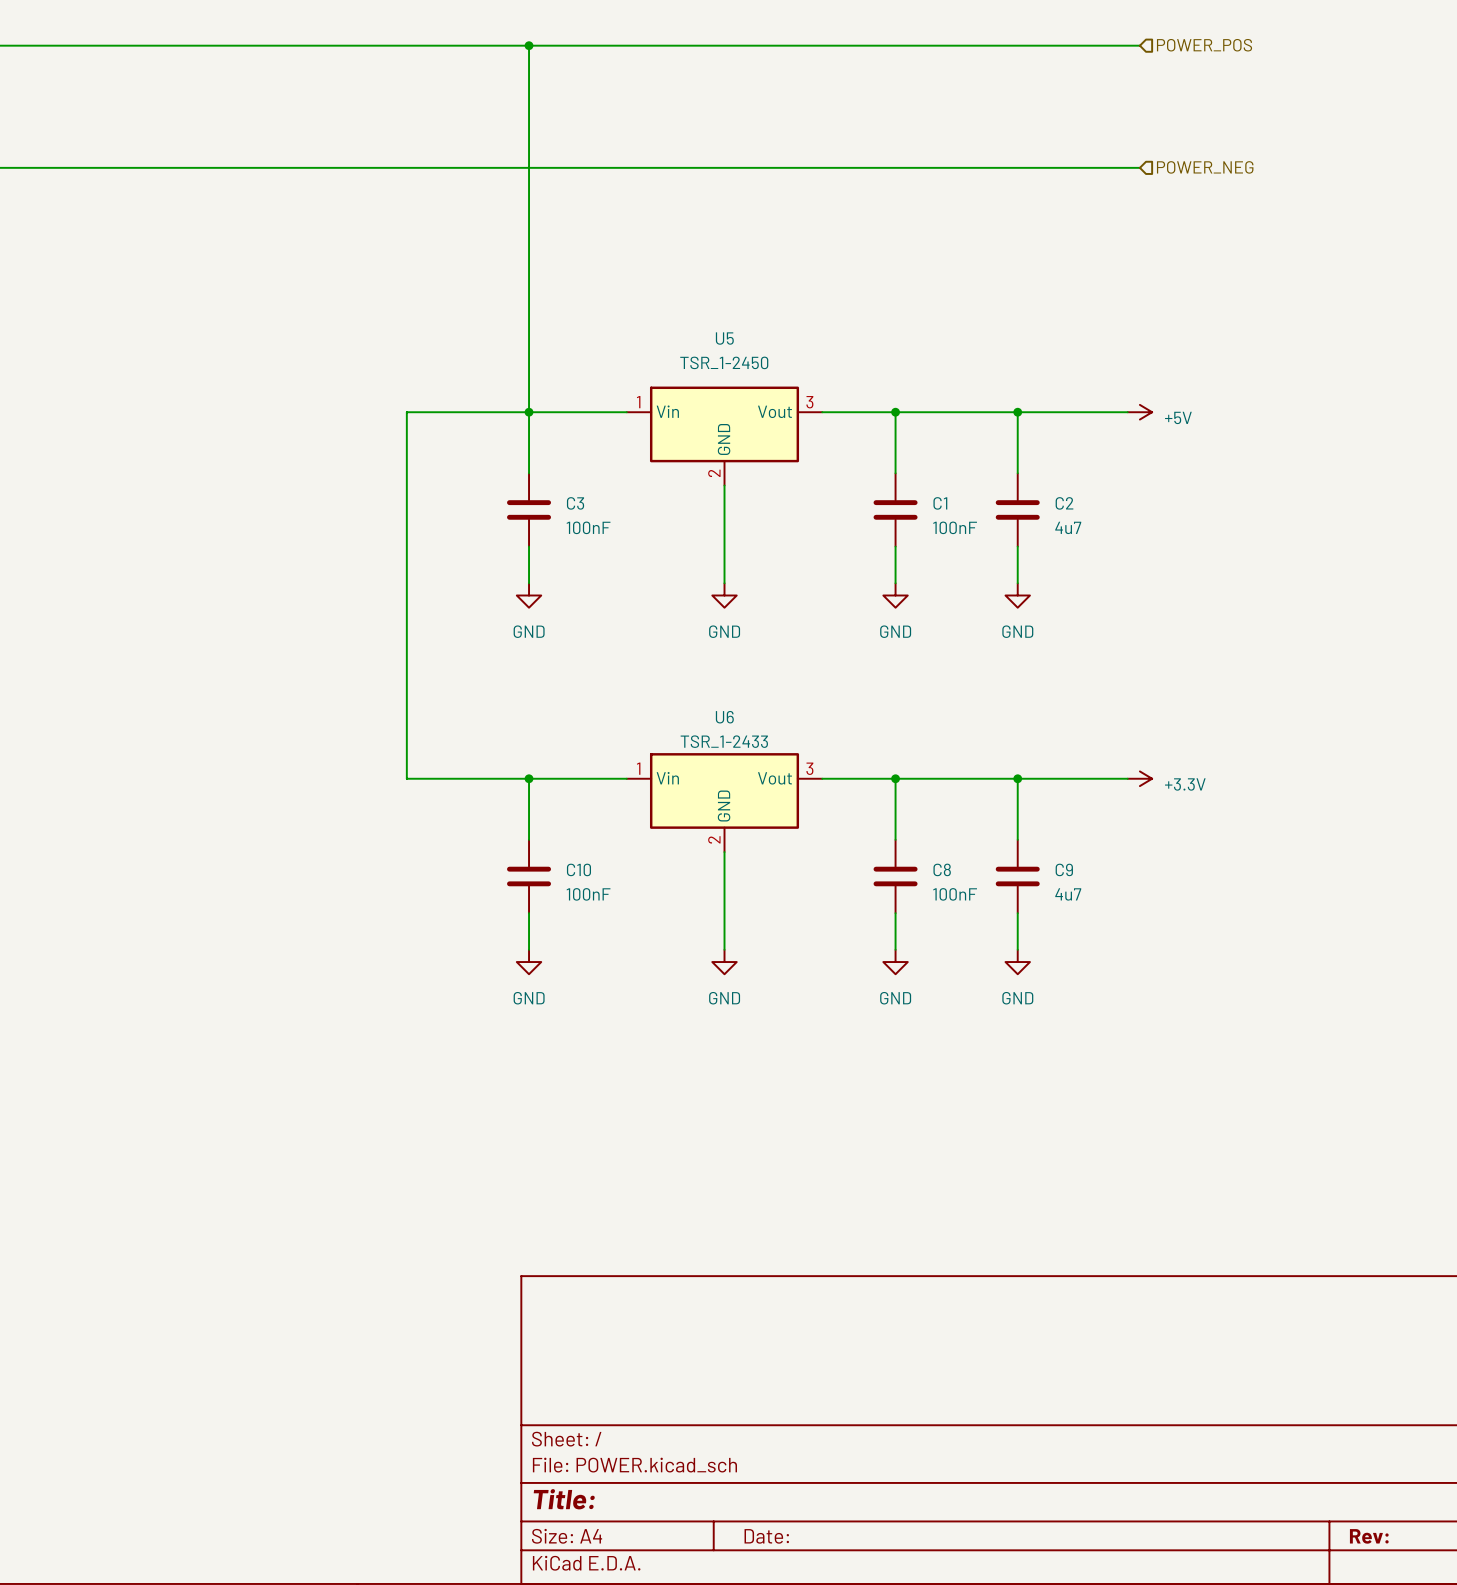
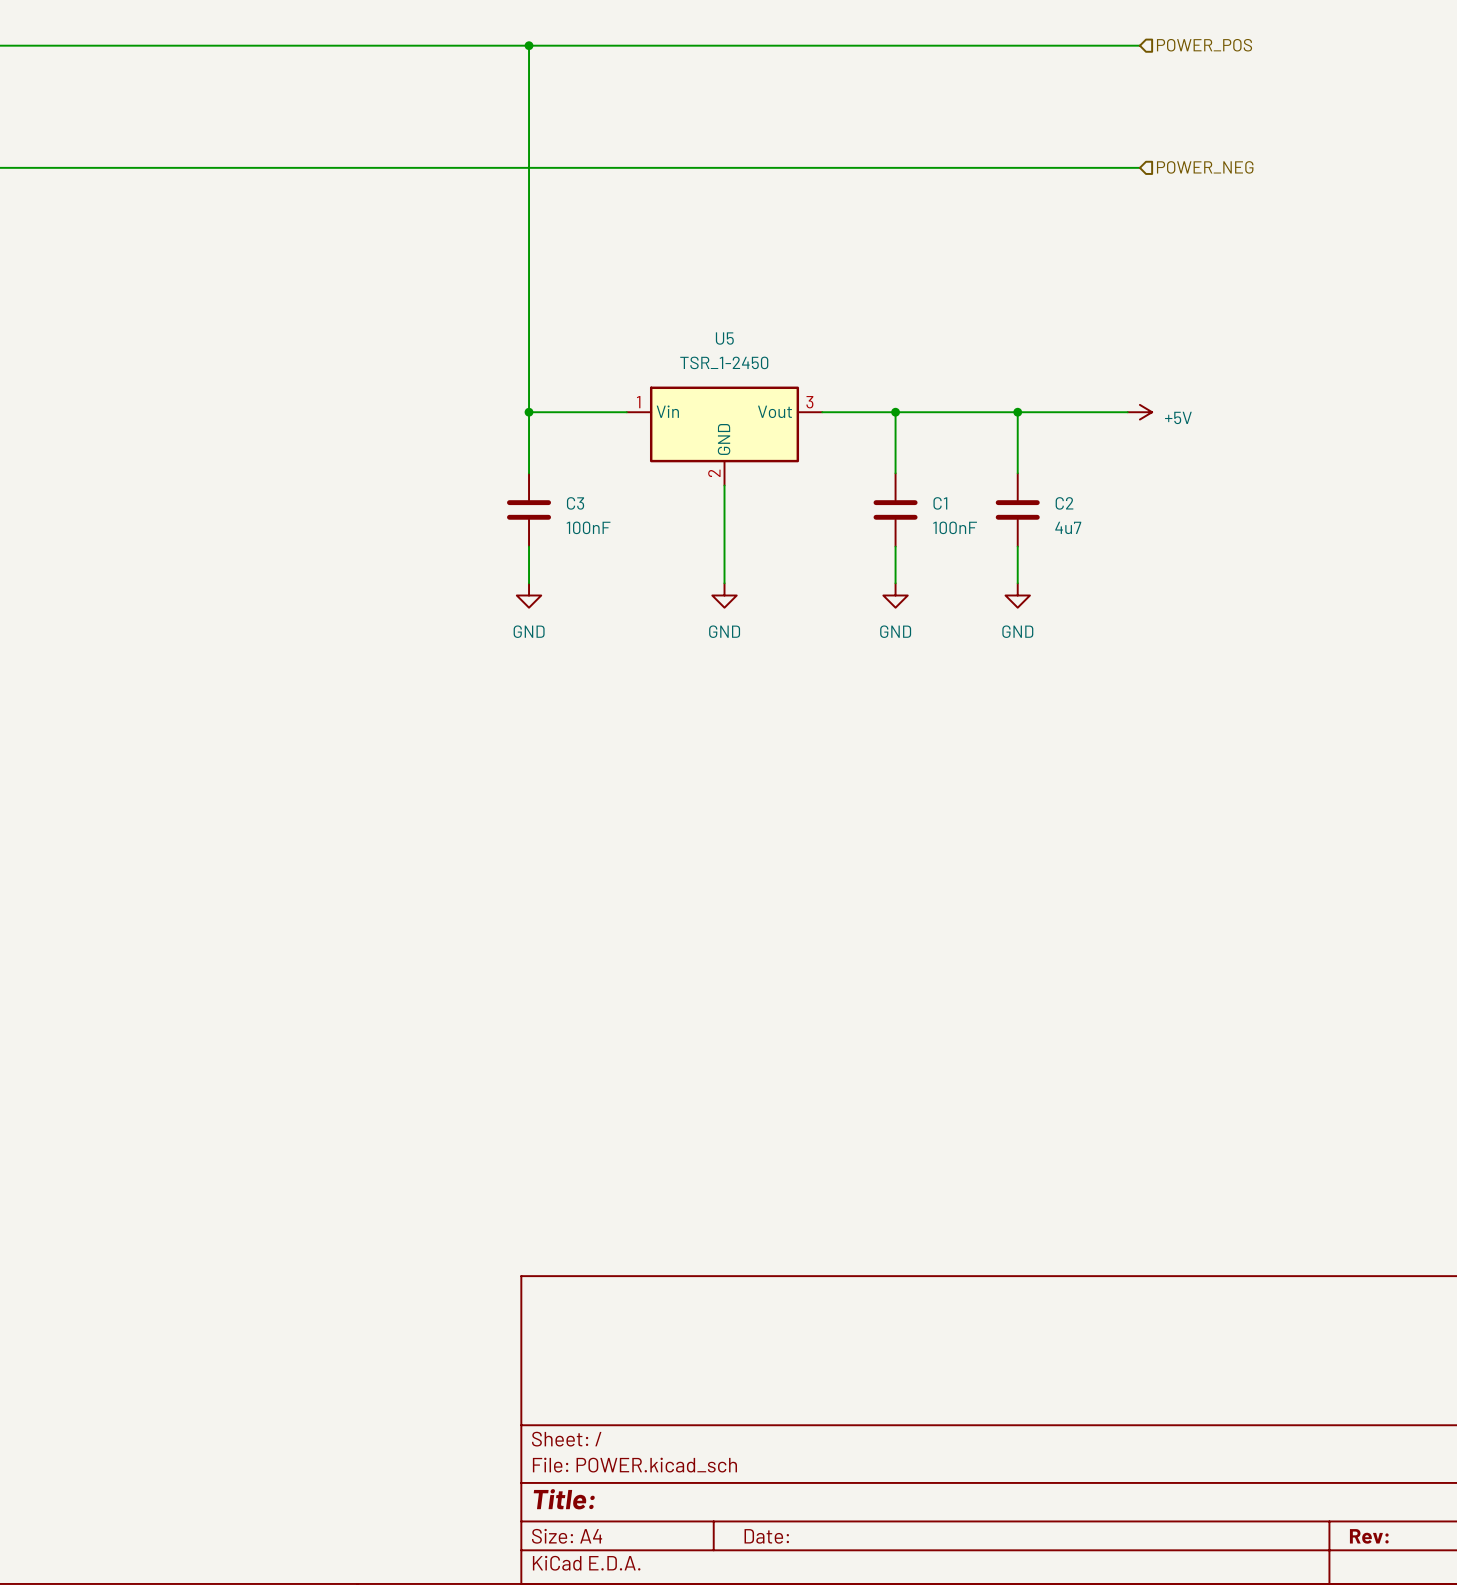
wire: (529, 412) (406, 412) (406, 778) (626, 778) -> none
wire: (529, 778) (529, 839) -> none
junction: (529, 778) -> none
wire: (822, 778) (1127, 778) -> none
wire: (895, 778) (895, 839) -> none
junction: (895, 778) -> none
wire: (1017, 778) (1017, 839) -> none
junction: (1017, 778) -> none
power symbol: +3.3V (1139, 778) -> none
U6: TSR_1-2433 (724, 802) -> none
wire: (724, 852) (724, 949) -> none
C10: 100nF (529, 876) -> none
C8: 100nF (895, 876) -> none
C9: 4u7 (1017, 876) -> none
wire: (529, 913) (529, 949) -> none
wire: (895, 913) (895, 949) -> none
wire: (1017, 913) (1017, 949) -> none
power symbol: GND (529, 962) -> none
power symbol: GND (724, 962) -> none
power symbol: GND (895, 962) -> none
power symbol: GND (1017, 962) -> none

